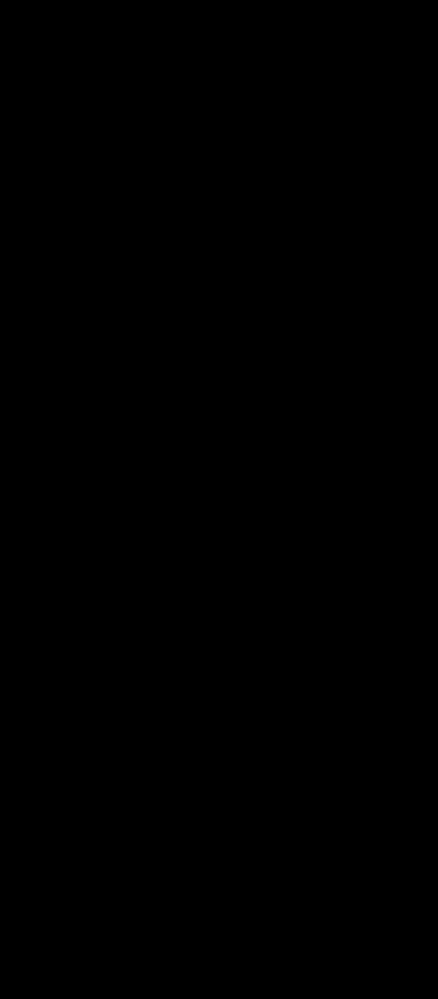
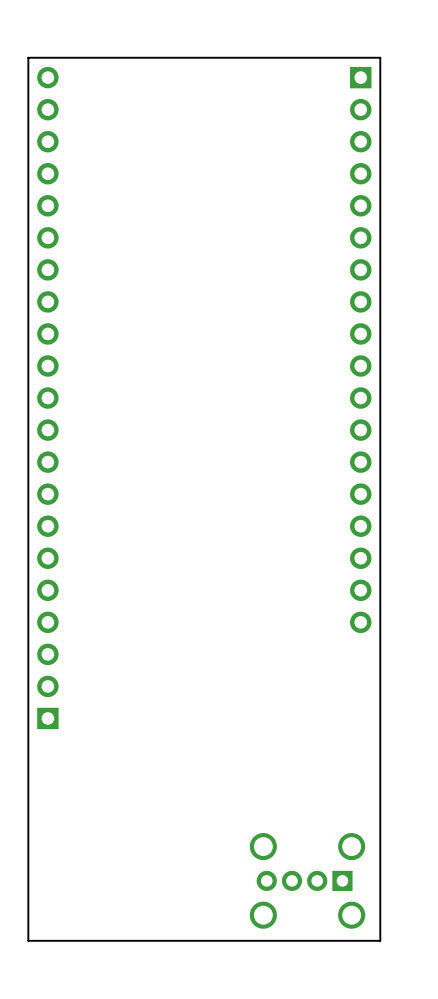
board edge: none -> (380, 57) (28, 57) (28, 940) (380, 940) (380, 57)
part: none -> (360, 349)
part: none -> (47, 398)
part: none -> (307, 880)

